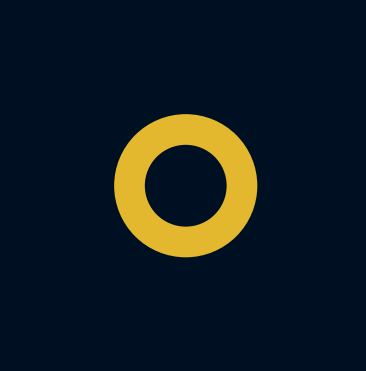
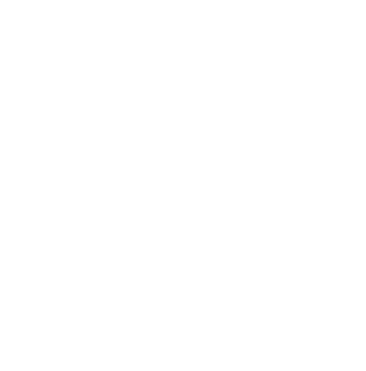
part: (185, 185) -> none

